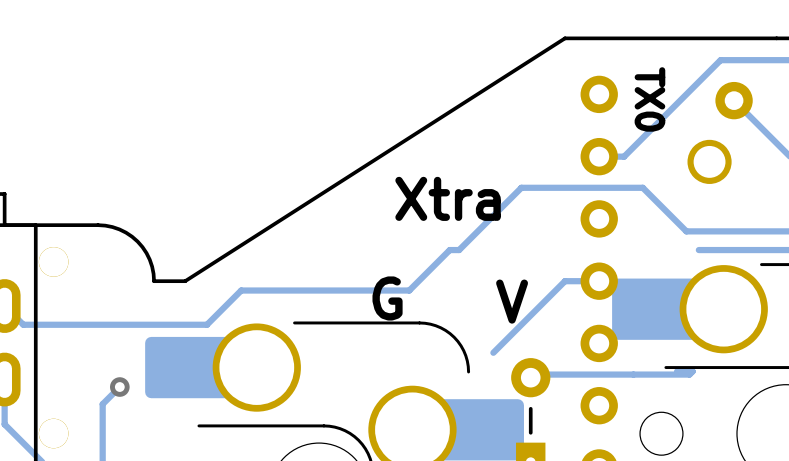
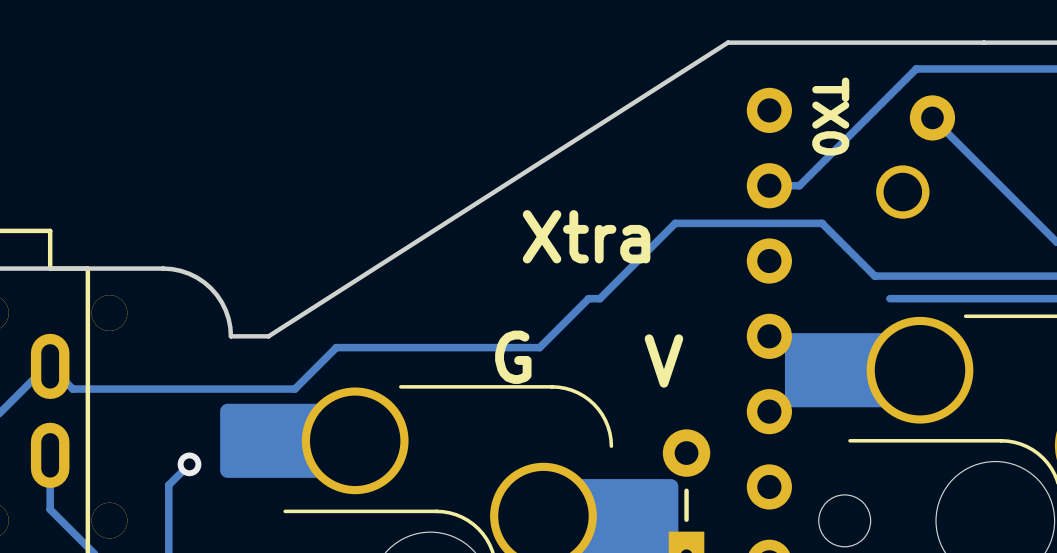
track: (599, 281) (564, 281) (493, 352) -> none
track: (677, 371) (692, 371) (689, 374) (533, 374) (530, 377) -> none

